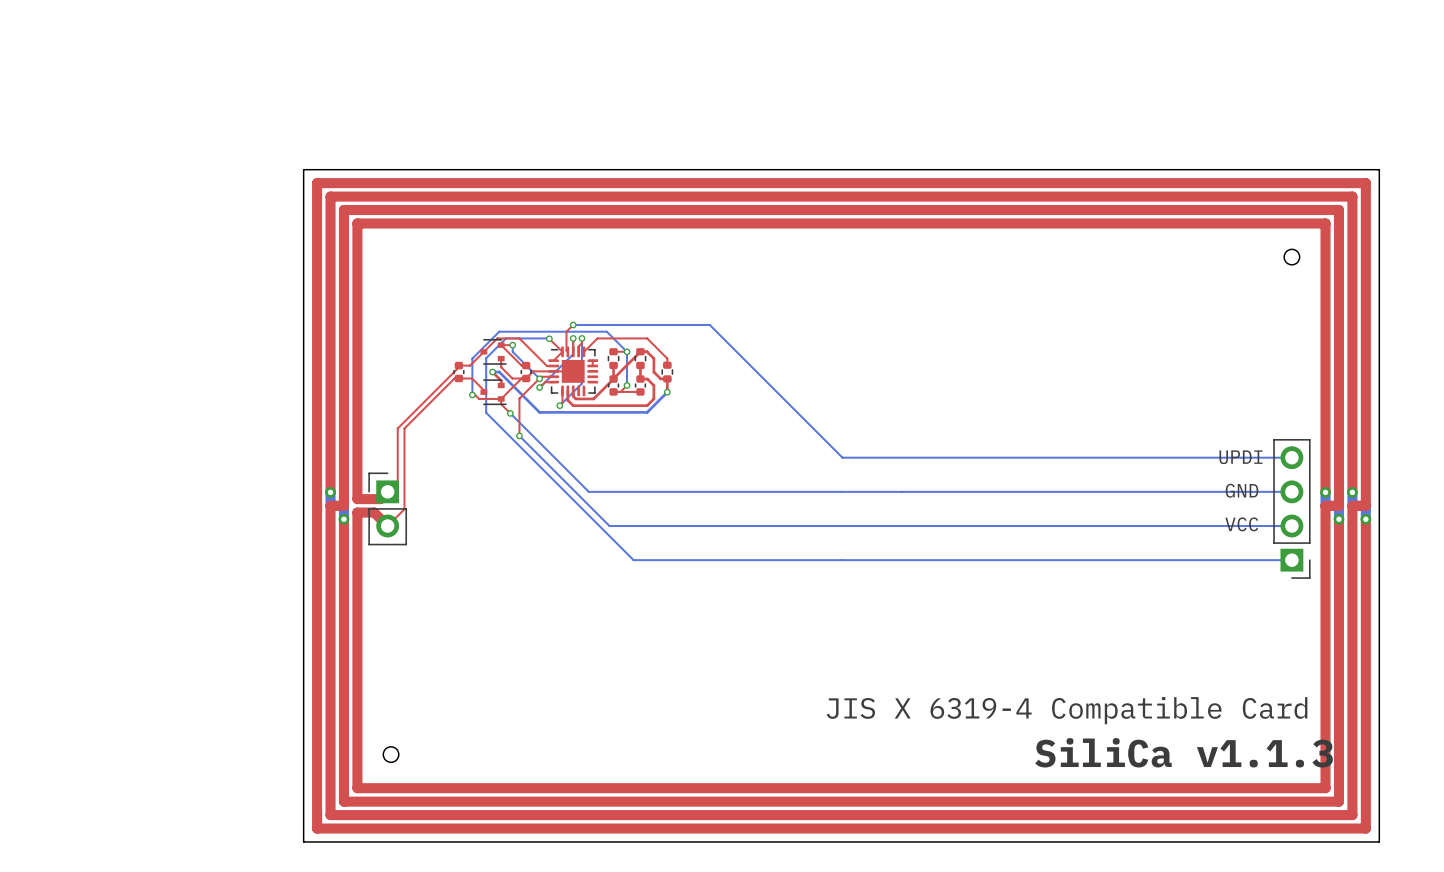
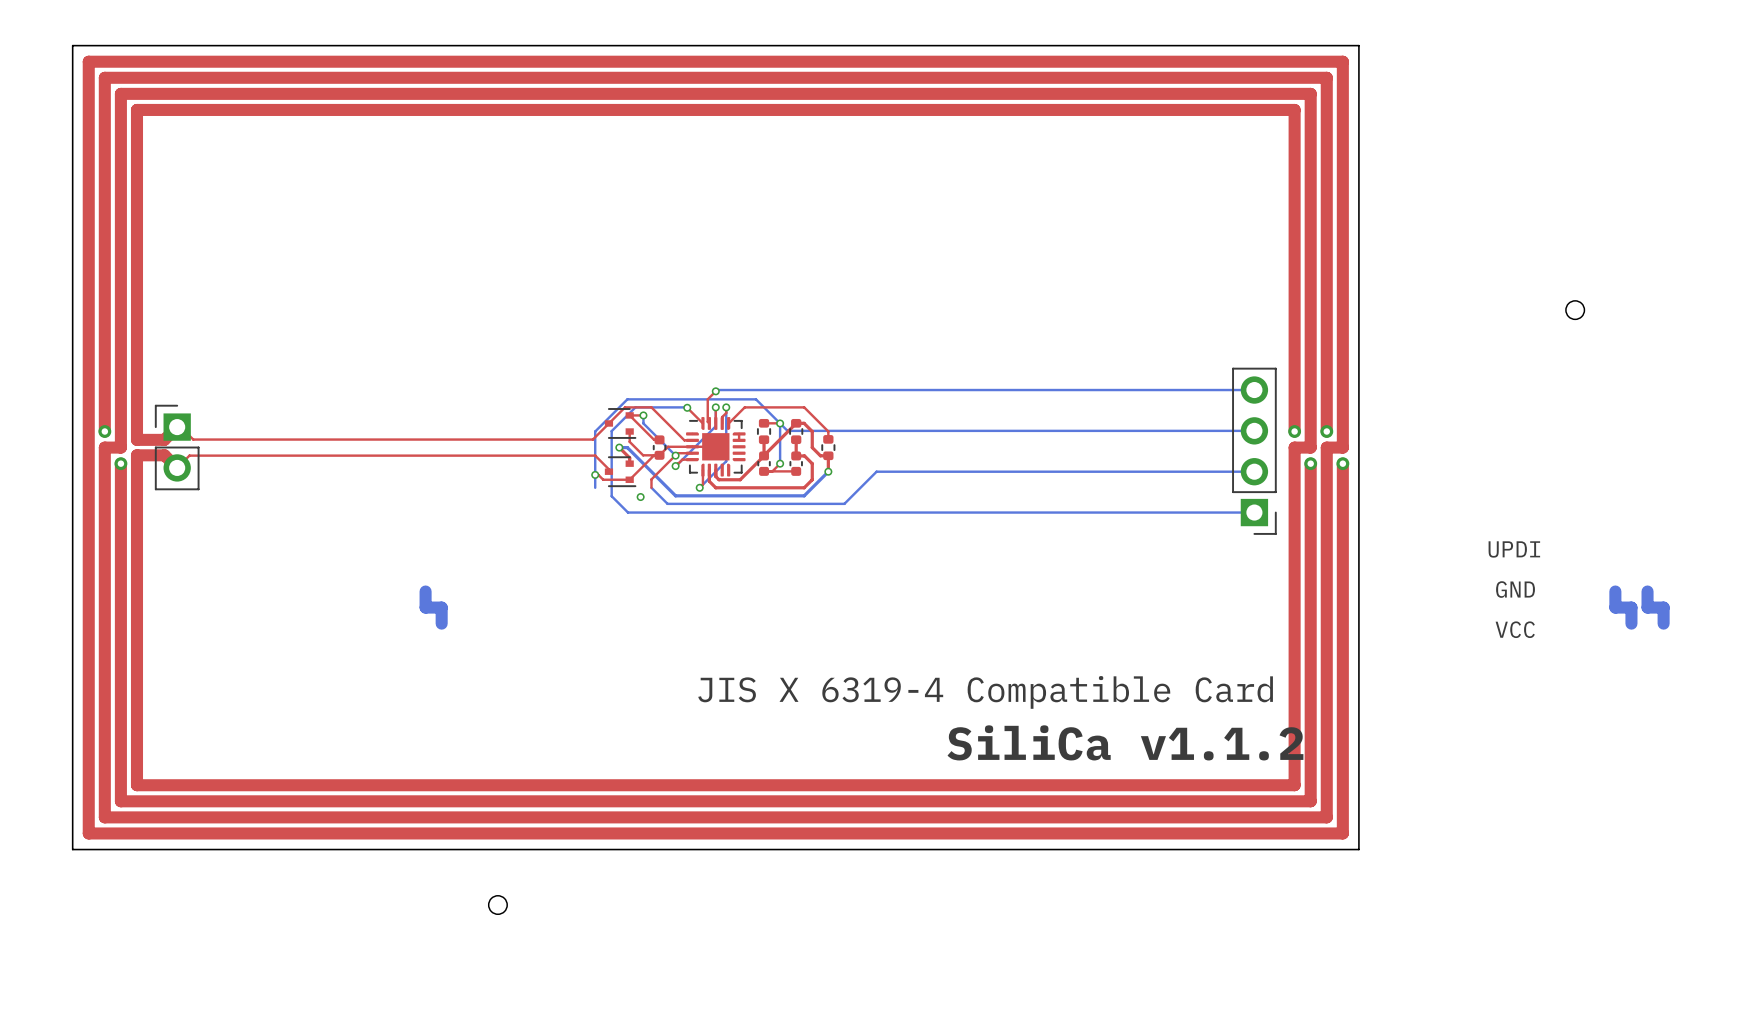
board edge: (303, 169) (1379, 169) (1379, 841) (303, 841) (303, 169) -> (72, 45) (1358, 45) (1358, 849) (72, 849) (72, 45)
bottom track: none -> (717, 390) (1254, 390)
bottom track: (573, 324) (709, 324) (842, 457) (1291, 457) -> none
top track: (562, 351) (553, 360) -> none
bottom track: none -> (780, 423) (787, 430) (1254, 430)
via: none -> (104, 431)
via: none -> (1294, 431)
via: none -> (1326, 431)
top track: (470, 365) (458, 365) (397, 428) (397, 481) (380, 499) (357, 499) (357, 223) (1325, 223) (1325, 492) -> (592, 439) (193, 439) (180, 427) (177, 427) (164, 439) (136, 439) (136, 109) (1294, 109) (1294, 431)
part: none -> (177, 447)
part: (458, 372) -> none
top track: (472, 378) (454, 378) (404, 428) (404, 509) (387, 526) (374, 512) (357, 512) (357, 788) (1325, 788) (1325, 505) (1338, 505) (1338, 210) (343, 210) (343, 505) (330, 505) (330, 815) (1352, 815) (1352, 505) (1365, 505) (1365, 183) (317, 183) (317, 828) (1365, 828) (1365, 519) -> (595, 455) (189, 455) (177, 467) (164, 455) (136, 455) (136, 785) (1294, 785) (1294, 447) (1310, 447) (1310, 93) (120, 93) (120, 447) (104, 447) (104, 817) (1326, 817) (1326, 447) (1342, 447) (1342, 61) (88, 61) (88, 833) (1342, 833) (1342, 463)
via: none -> (120, 463)
via: none -> (1310, 463)
via: none -> (1342, 463)
bottom track: none -> (1254, 471) (876, 471) (844, 503) (667, 503) (651, 487)
bottom track: none -> (595, 474) (595, 487)
top track: (501, 398) (501, 404) (510, 413) -> none
top track: (519, 405) (519, 435) -> none
bottom track: (510, 413) (588, 491) (1291, 491) -> none
bottom track: (499, 426) (633, 560) (1291, 560) -> (628, 512) (1254, 512)
bottom track: (519, 435) (609, 526) (1291, 526) -> none
via: (519, 435) -> none
top track: (330, 492) (330, 196) (1352, 196) (1352, 492) -> (104, 431) (104, 77) (1326, 77) (1326, 431)
via: (330, 492) -> none
via: (1325, 492) -> none
via: (1352, 492) -> none
part: (387, 508) -> none
part position: (1291, 508) -> (1254, 451)
top track: (343, 519) (343, 801) (1338, 801) (1338, 519) -> (120, 463) (120, 801) (1310, 801) (1310, 463)
via: (343, 519) -> none
via: (1338, 519) -> none
via: (1365, 519) -> none
text: none -> SiliCa v1.1.2 (1125, 742)
text position: JIS X 6319-4 Compatible Card (1067, 710) -> JIS X 6319-4 Compatible Card (985, 692)
text: SiliCa v1.1.3 (1184, 752) -> none

